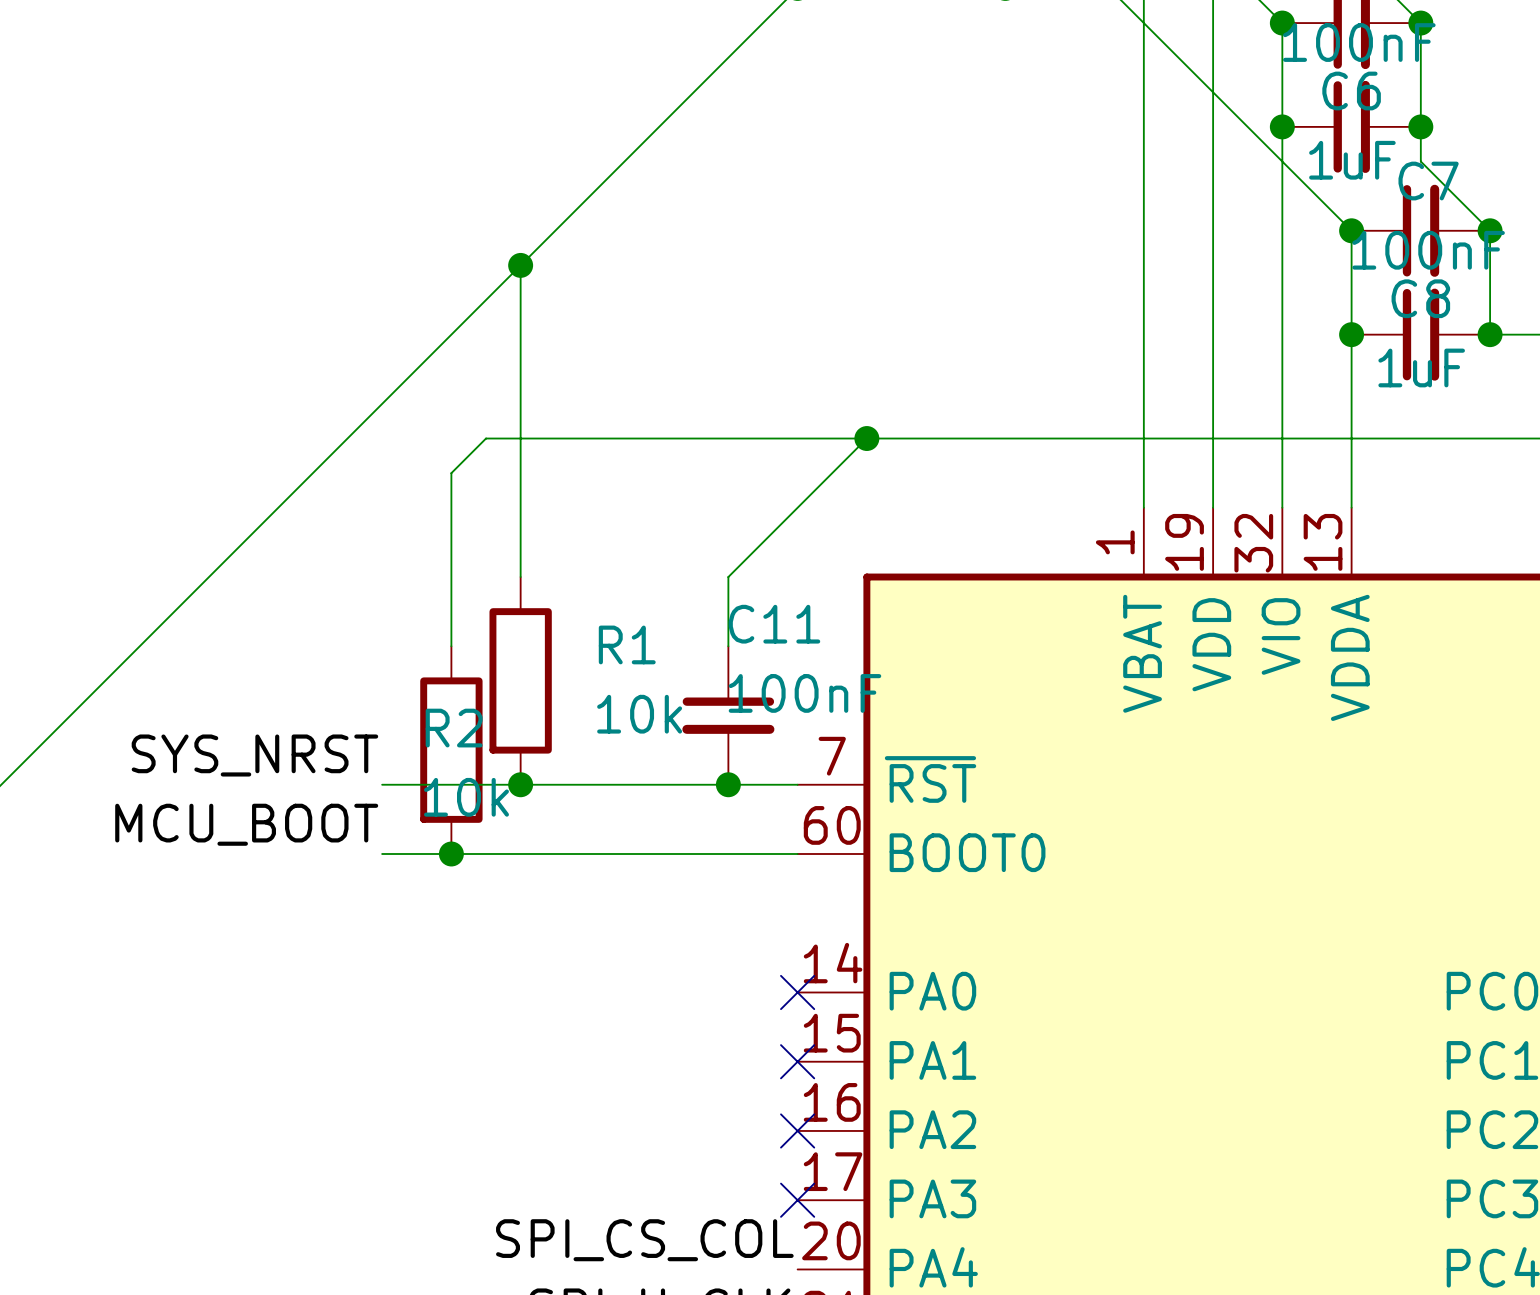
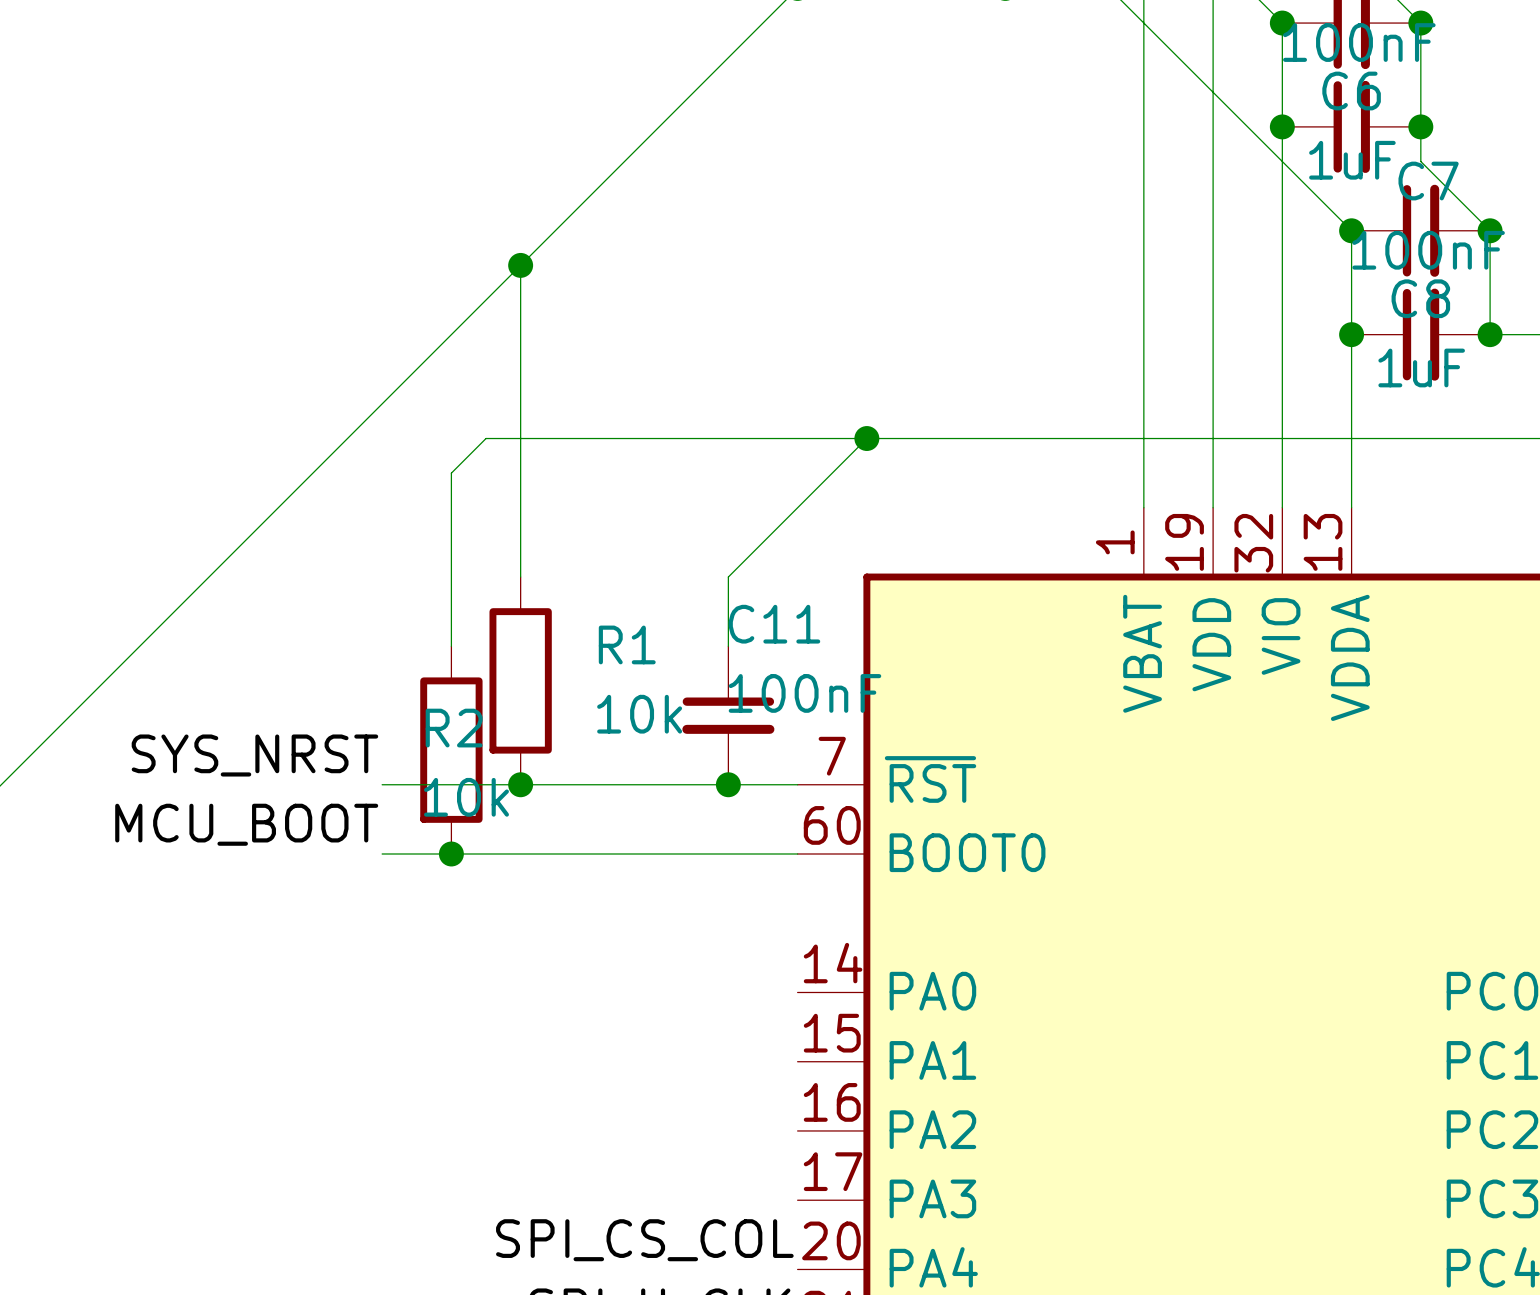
no-connect mark: (797, 992) -> none
no-connect mark: (797, 1061) -> none
no-connect mark: (797, 1130) -> none
no-connect mark: (797, 1200) -> none

